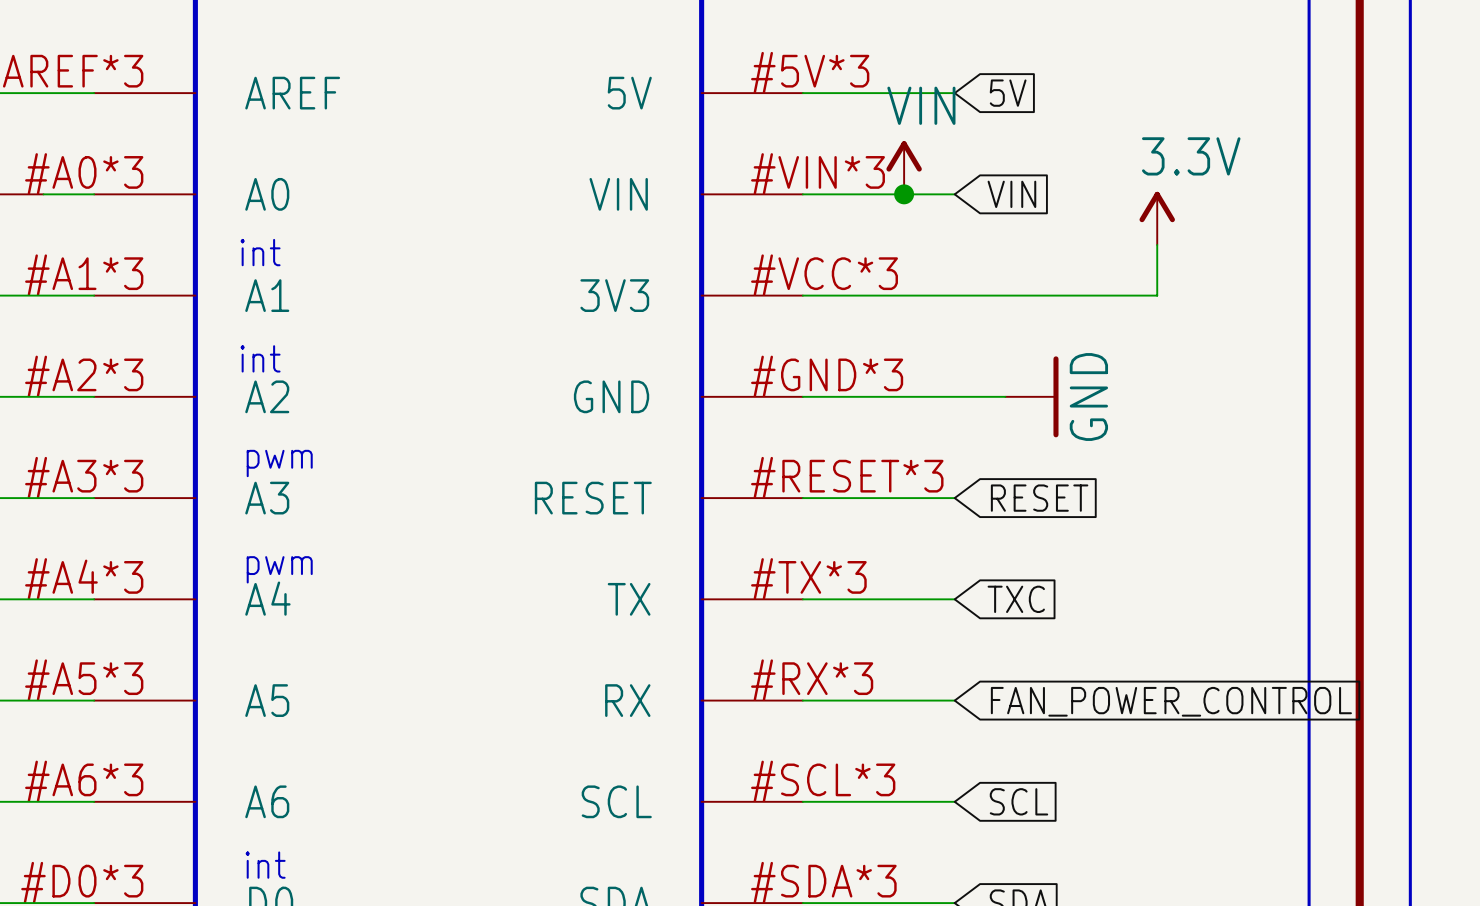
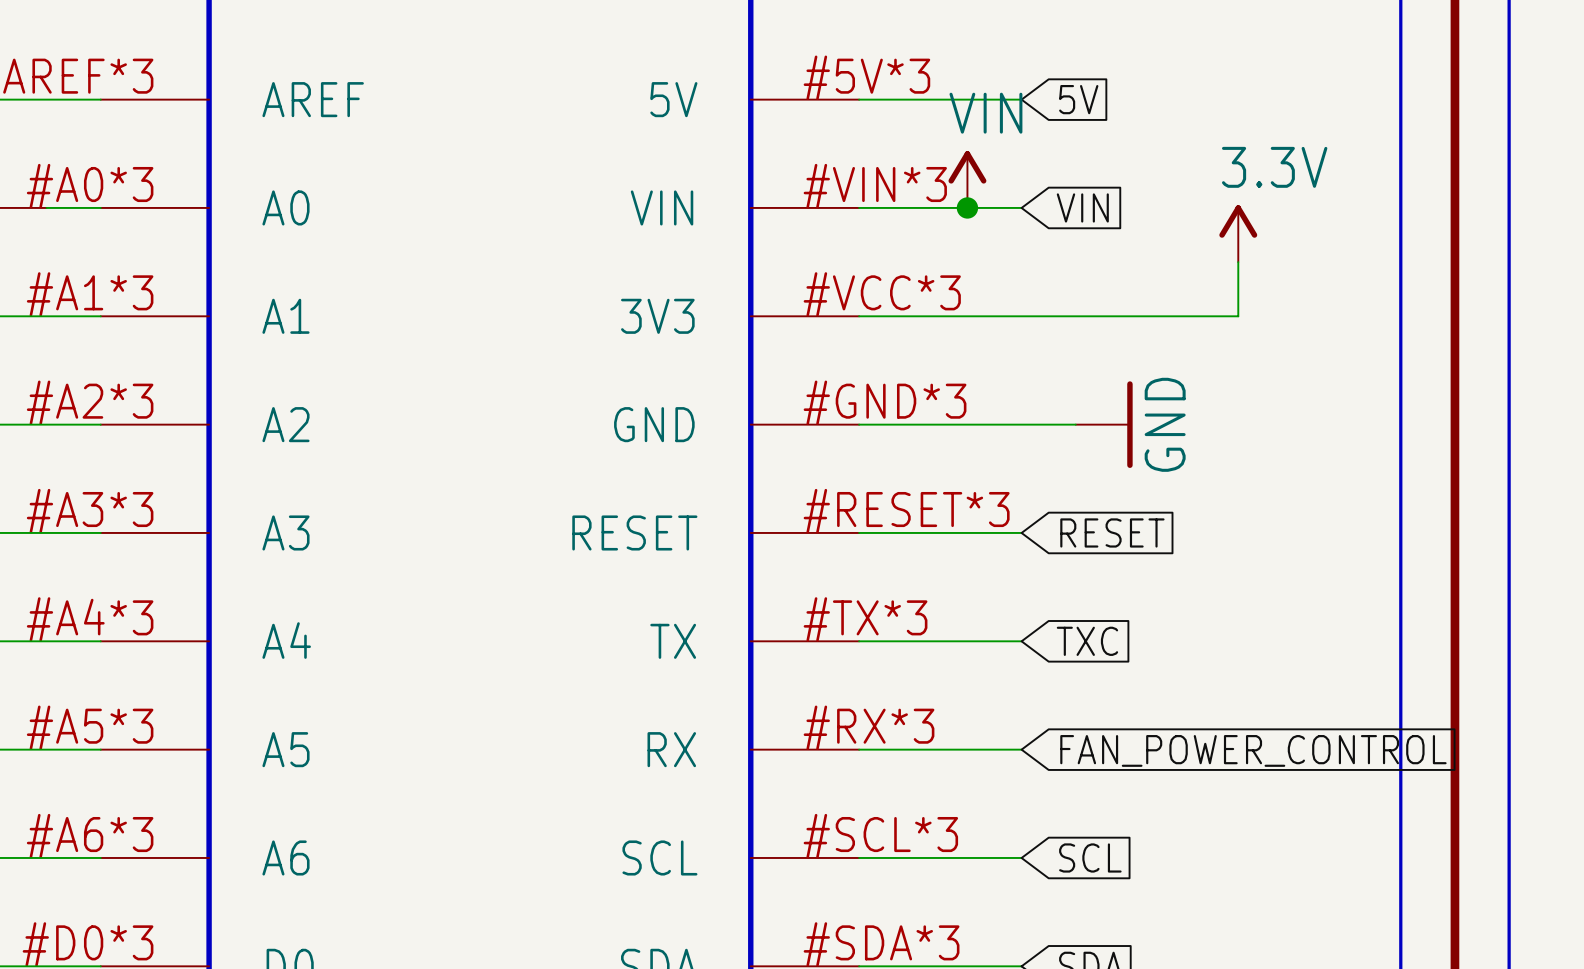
text: int (260, 252) -> none
text: int (260, 358) -> none
text: pwm (279, 463) -> none
text: pwm (279, 569) -> none
text: int (265, 865) -> none

